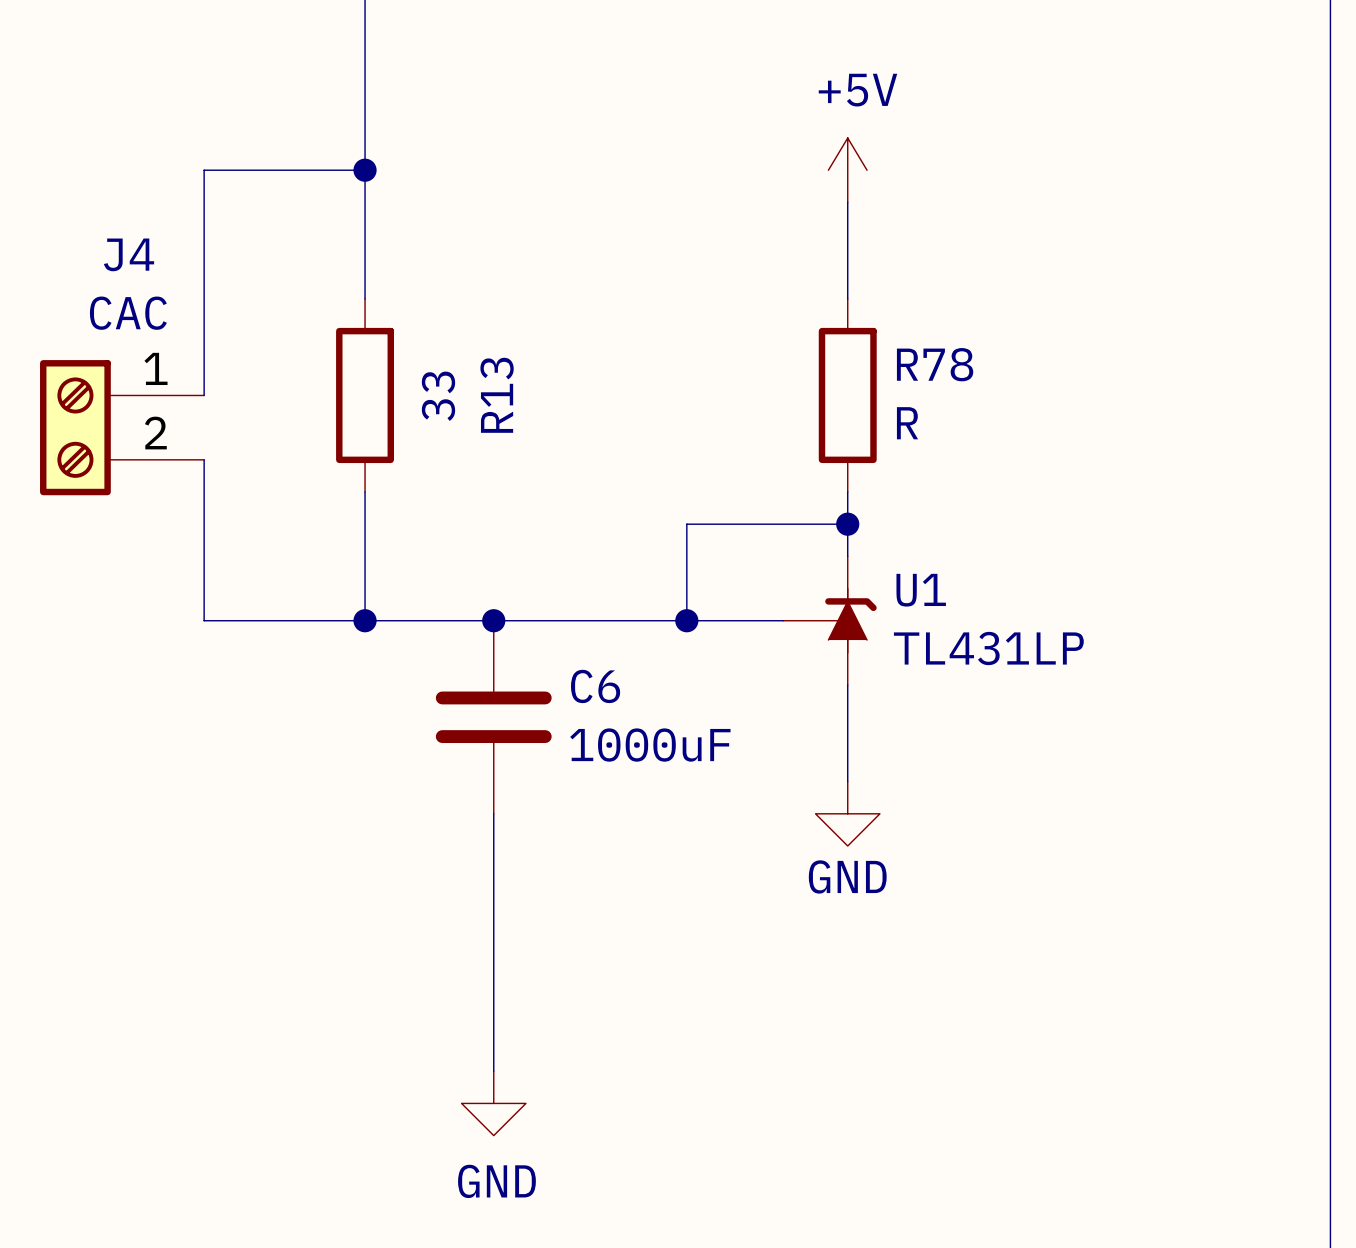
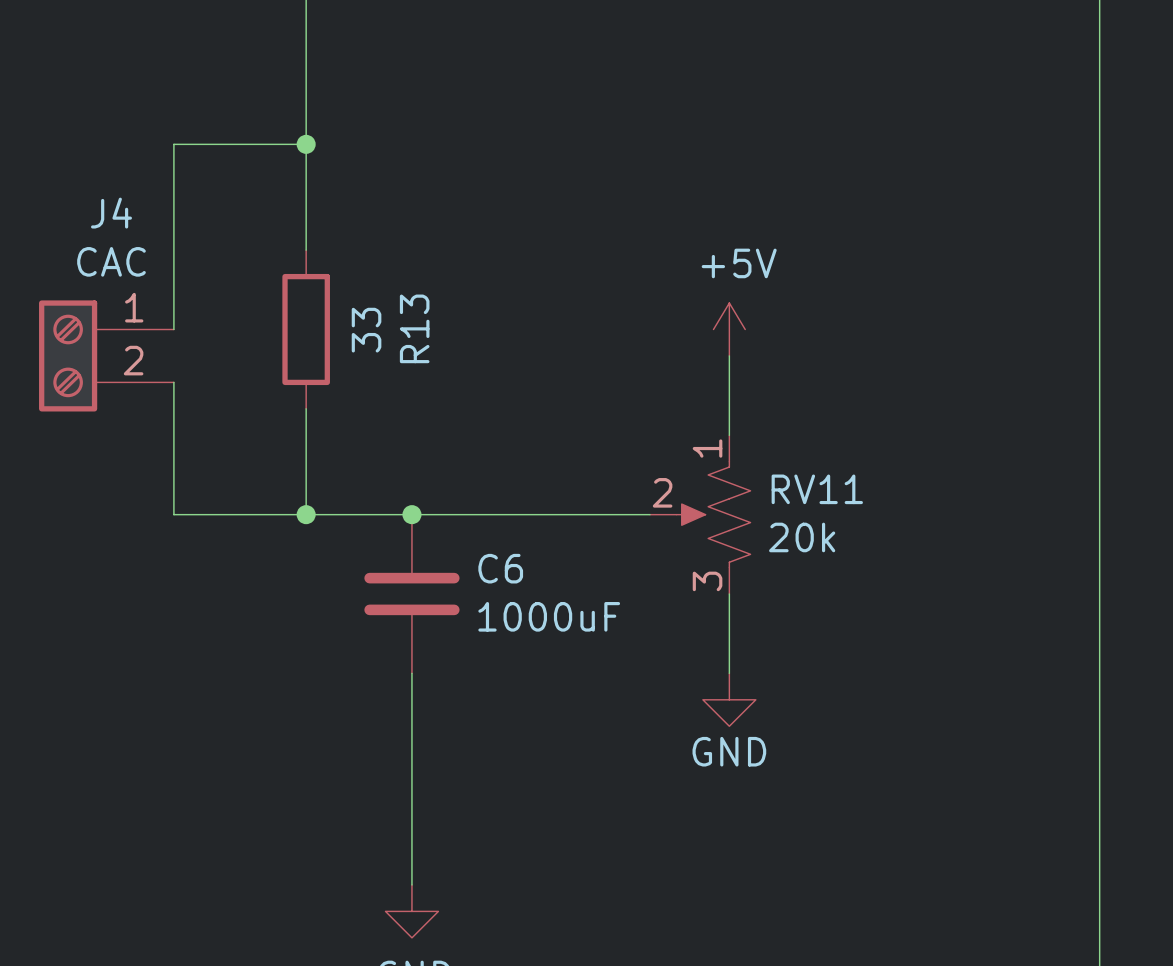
power symbol position: +5V (847, 170) -> +5V (729, 329)
wire: (847, 202) (847, 298) -> (729, 355) (729, 435)
R78: R (847, 395) -> none
wire: (847, 492) (847, 556) -> none
wire: (847, 524) (686, 524) (686, 620) -> none
junction: (847, 524) -> none
junction: (686, 620) -> none
U1: TL431LP (830, 620) -> none
RV11: none -> 20k (700, 514)
wire: (847, 685) (847, 781) -> (729, 594) (729, 673)
power symbol position: GND (847, 813) -> GND (729, 699)

